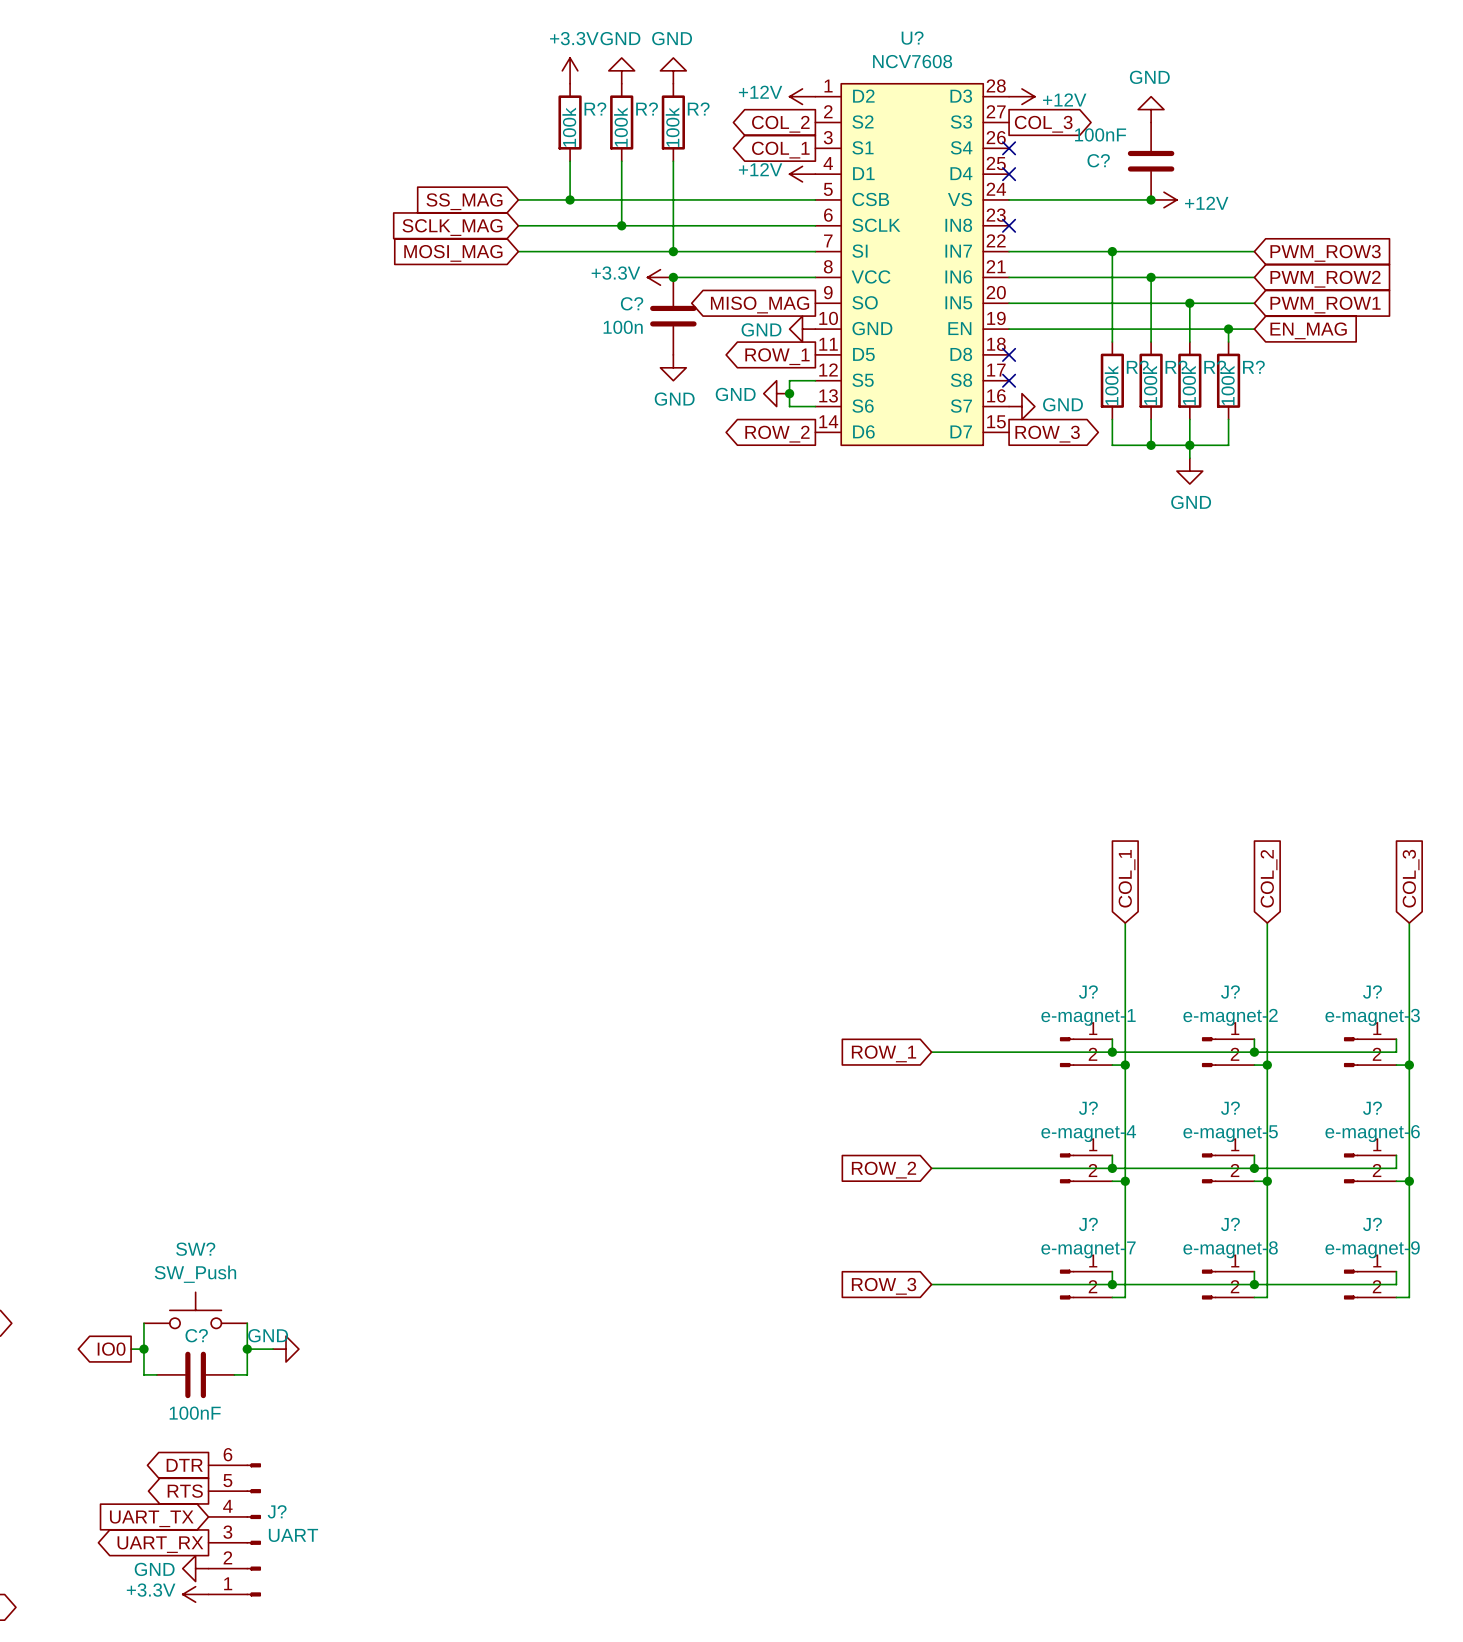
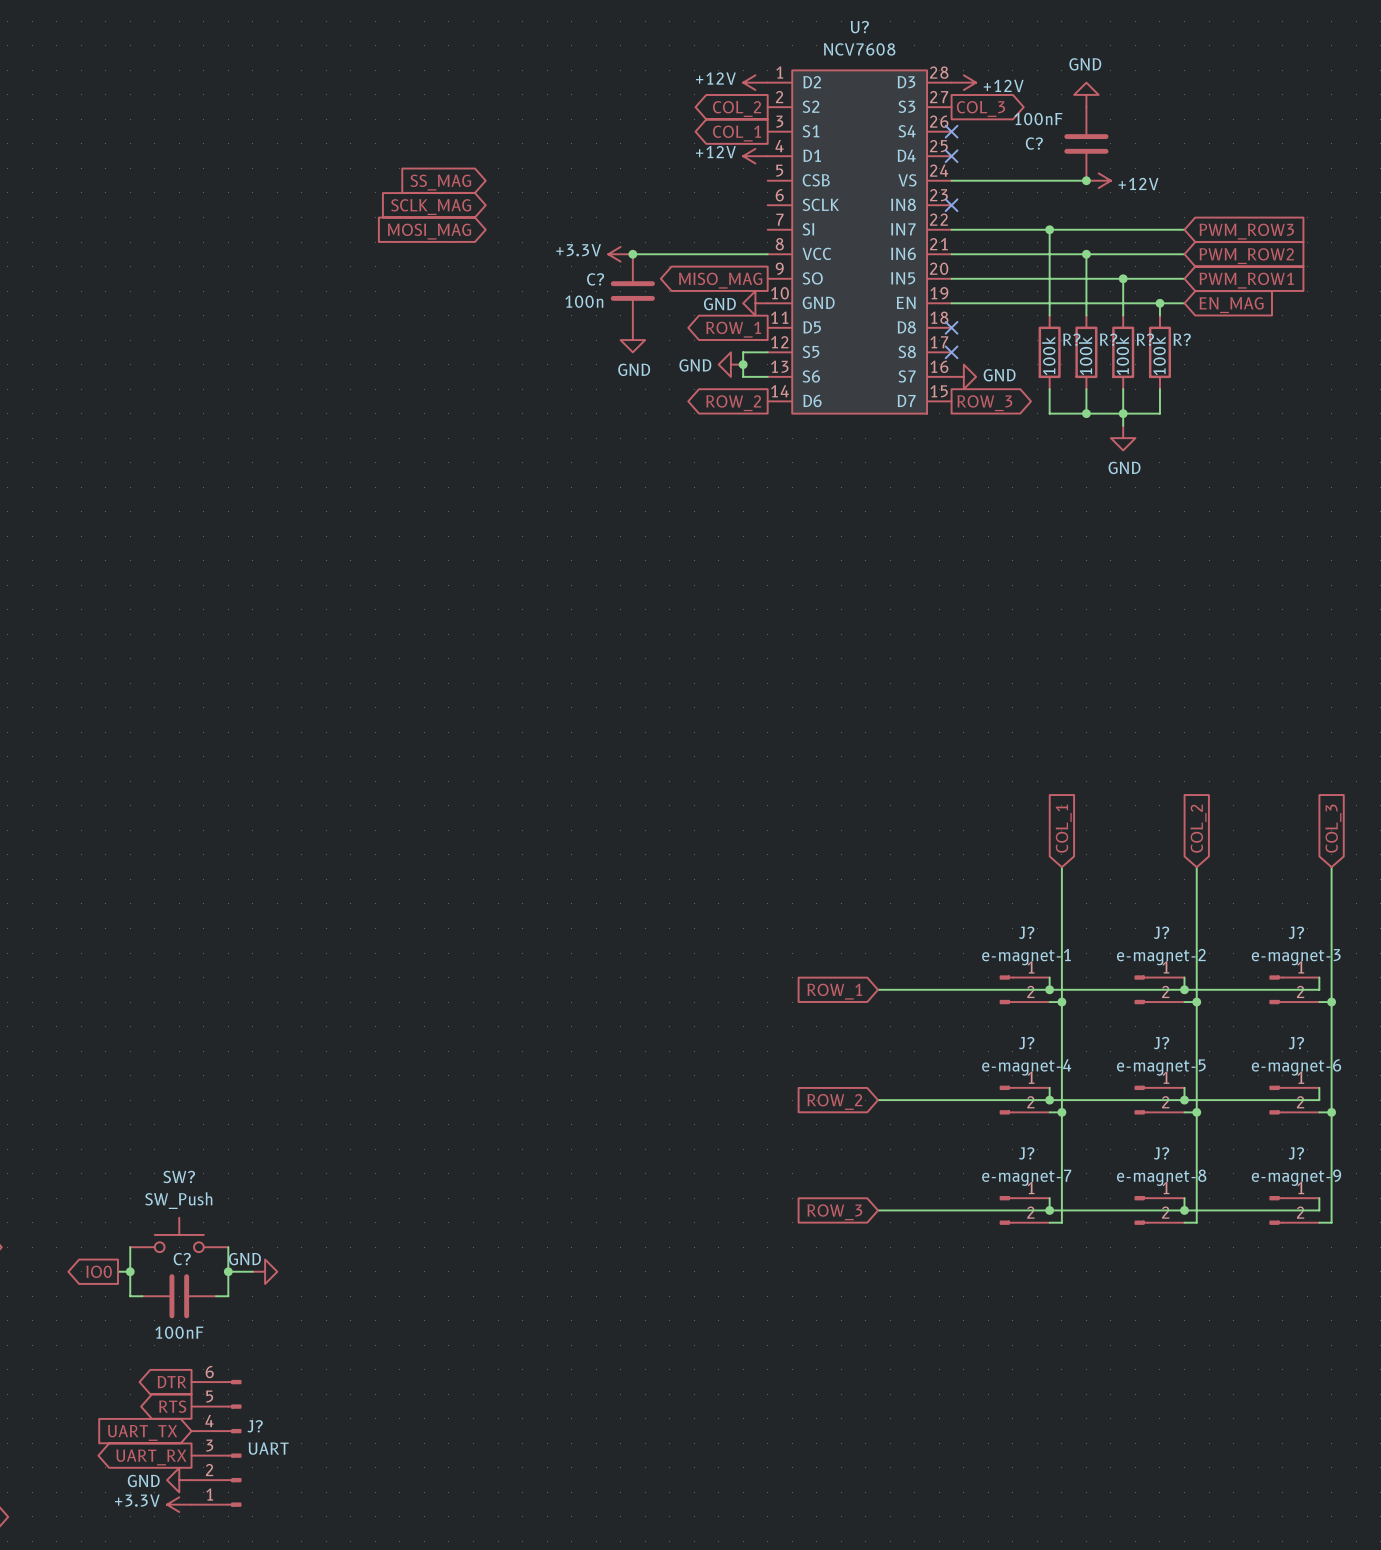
power symbol: +3.3V (570, 70) -> none
power symbol: GND (621, 70) -> none
power symbol: GND (673, 70) -> none
R?: 100k (570, 122) -> none
R?: 100k (621, 122) -> none
R?: 100k (673, 122) -> none
wire: (570, 161) (570, 199) -> none
wire: (621, 161) (621, 225) -> none
wire: (673, 161) (673, 251) -> none
wire: (518, 199) (815, 199) -> none
junction: (570, 199) -> none
wire: (518, 225) (815, 225) -> none
junction: (621, 225) -> none
wire: (518, 251) (815, 251) -> none
junction: (673, 251) -> none

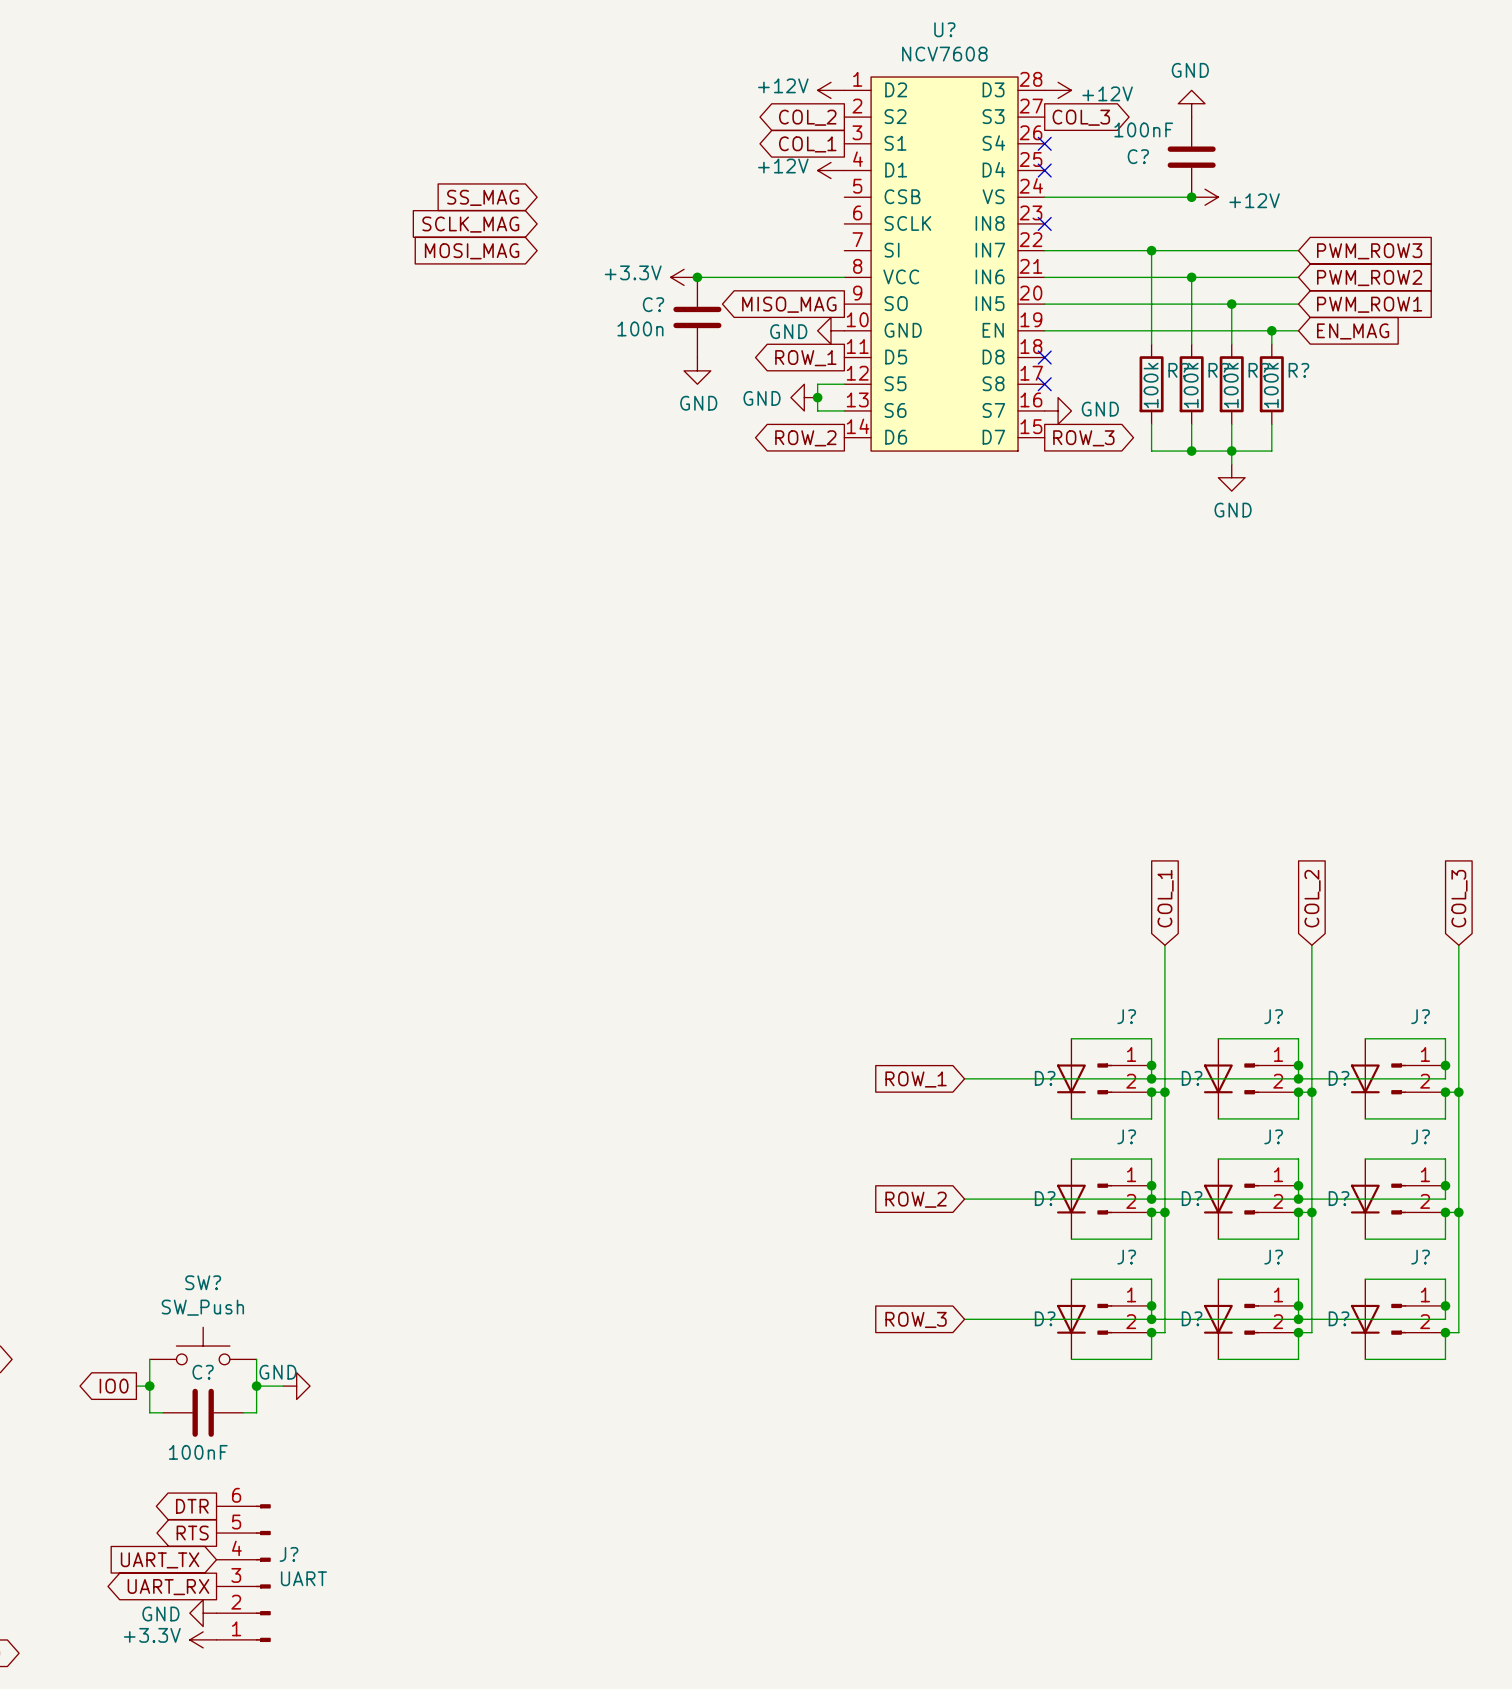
wire: none -> (1071, 1038) (1151, 1038) (1151, 1065)
wire: none -> (1218, 1038) (1298, 1038) (1298, 1065)
wire: none -> (1365, 1038) (1445, 1038) (1445, 1065)
J? value: e-magnet-1 (1026, 957) -> none
J? value: e-magnet-2 (1161, 957) -> none
J? value: e-magnet-3 (1296, 957) -> none
junction: none -> (1151, 1065)
junction: none -> (1298, 1065)
junction: none -> (1445, 1065)
D?: none -> (1071, 1078)
D?: none -> (1218, 1078)
D?: none -> (1365, 1078)
wire: none -> (1151, 1092) (1151, 1118) (1071, 1118)
junction: none -> (1151, 1092)
wire: none -> (1298, 1092) (1298, 1118) (1218, 1118)
junction: none -> (1298, 1092)
wire: none -> (1445, 1092) (1445, 1118) (1365, 1118)
junction: none -> (1445, 1092)
wire: none -> (1071, 1159) (1151, 1159) (1151, 1185)
wire: none -> (1218, 1159) (1298, 1159) (1298, 1185)
wire: none -> (1365, 1159) (1445, 1159) (1445, 1185)
J? value: e-magnet-4 (1026, 1067) -> none
J? value: e-magnet-5 (1161, 1067) -> none
J? value: e-magnet-6 (1296, 1067) -> none
junction: none -> (1151, 1185)
junction: none -> (1298, 1185)
junction: none -> (1445, 1185)
D?: none -> (1071, 1199)
D?: none -> (1218, 1199)
D?: none -> (1365, 1199)
wire: none -> (1151, 1212) (1151, 1239) (1071, 1239)
junction: none -> (1151, 1212)
wire: none -> (1298, 1212) (1298, 1239) (1218, 1239)
junction: none -> (1298, 1212)
wire: none -> (1445, 1212) (1445, 1239) (1365, 1239)
junction: none -> (1445, 1212)
wire: none -> (1071, 1279) (1151, 1279) (1151, 1305)
wire: none -> (1218, 1279) (1298, 1279) (1298, 1305)
wire: none -> (1365, 1279) (1445, 1279) (1445, 1305)
J? value: e-magnet-7 (1026, 1177) -> none
J? value: e-magnet-8 (1161, 1177) -> none
J? value: e-magnet-9 (1296, 1177) -> none
junction: none -> (1151, 1305)
junction: none -> (1298, 1305)
junction: none -> (1445, 1305)
D?: none -> (1071, 1319)
D?: none -> (1218, 1319)
D?: none -> (1365, 1319)
wire: none -> (1151, 1332) (1151, 1359) (1071, 1359)
junction: none -> (1151, 1332)
wire: none -> (1298, 1332) (1298, 1359) (1218, 1359)
junction: none -> (1298, 1332)
wire: none -> (1445, 1332) (1445, 1359) (1365, 1359)
junction: none -> (1445, 1332)

